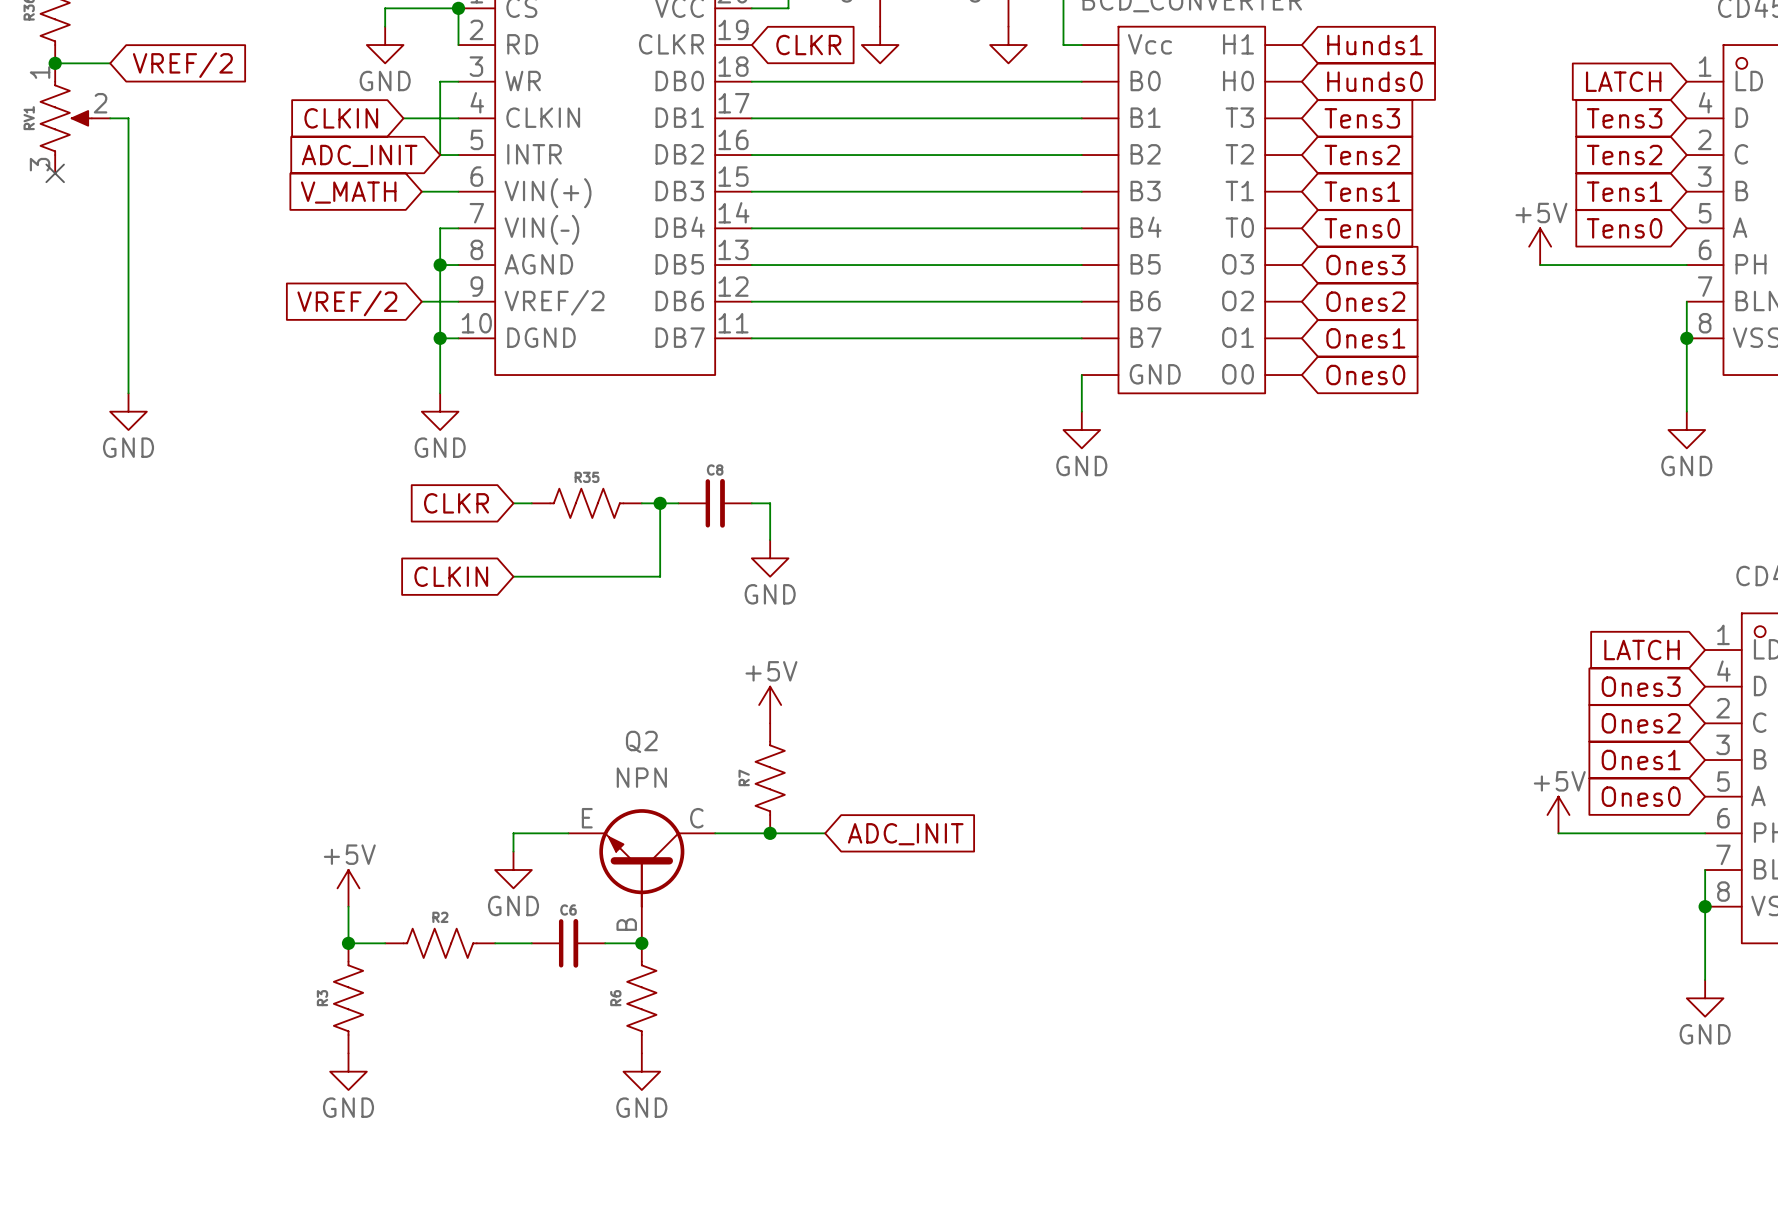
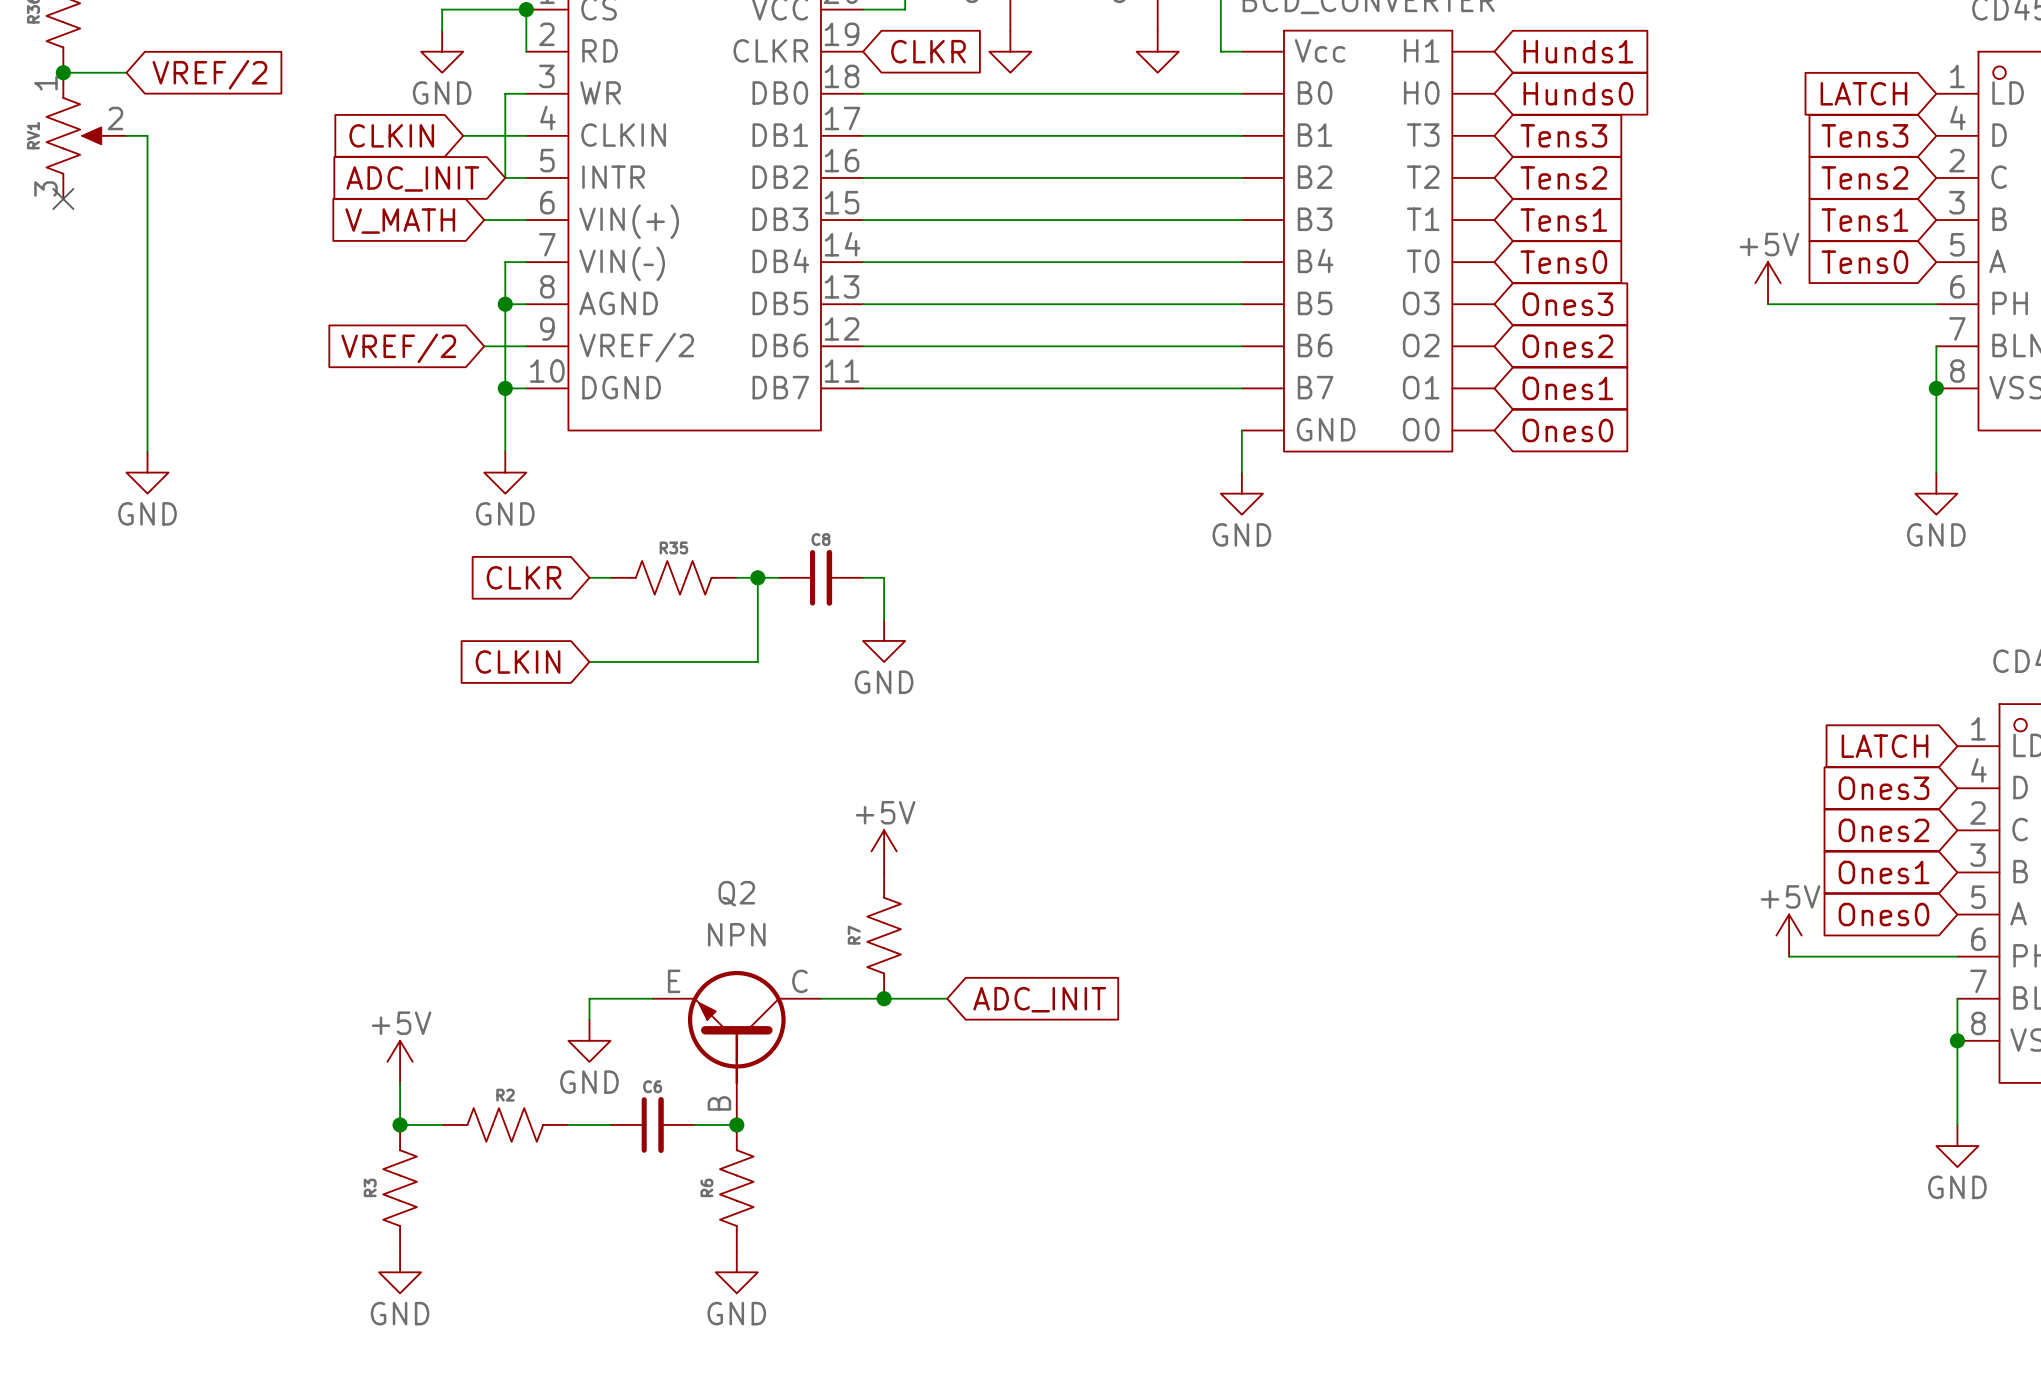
power symbol position: +5V (770, 705) -> +5V (884, 851)
R7 position: (770, 778) -> (884, 935)
wire: (568, 833) (513, 833) (513, 851) -> (652, 998) (589, 998) (589, 1019)
wire: (715, 833) (825, 833) -> (820, 998) (947, 998)
junction position: (770, 833) -> (884, 998)
global label position: ADC_INIT (905, 834) -> ADC_INIT (1039, 999)
power symbol position: GND (513, 870) -> GND (589, 1040)
Q2 position: (641, 876) -> (736, 1047)
power symbol position: +5V (348, 888) -> +5V (400, 1061)
wire: (348, 906) (348, 943) (385, 943) -> (400, 1082) (400, 1125) (442, 1125)
junction position: (348, 943) -> (400, 1125)
R2 position: (440, 943) -> (505, 1125)
wire: (495, 943) (531, 943) -> (568, 1125) (610, 1125)
C6 position: (568, 943) -> (652, 1125)
wire: (605, 943) (641, 943) -> (694, 1125) (736, 1125)
junction position: (641, 943) -> (736, 1125)
R3 position: (348, 998) -> (400, 1188)
R6 position: (641, 998) -> (736, 1188)
power symbol position: GND (348, 1071) -> GND (400, 1272)
power symbol position: GND (641, 1071) -> GND (736, 1272)

